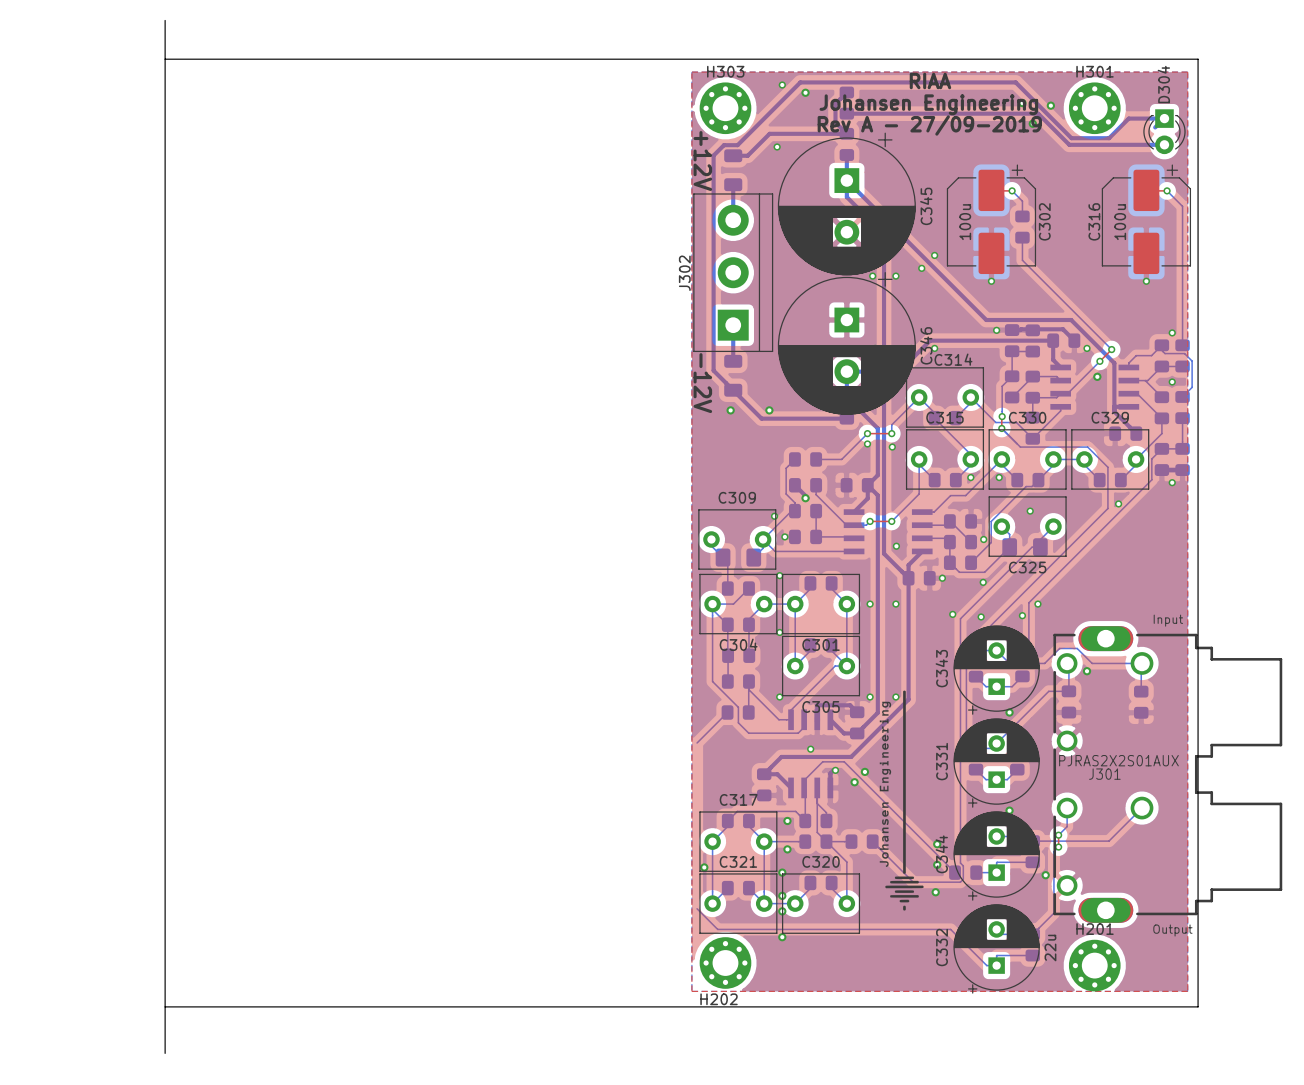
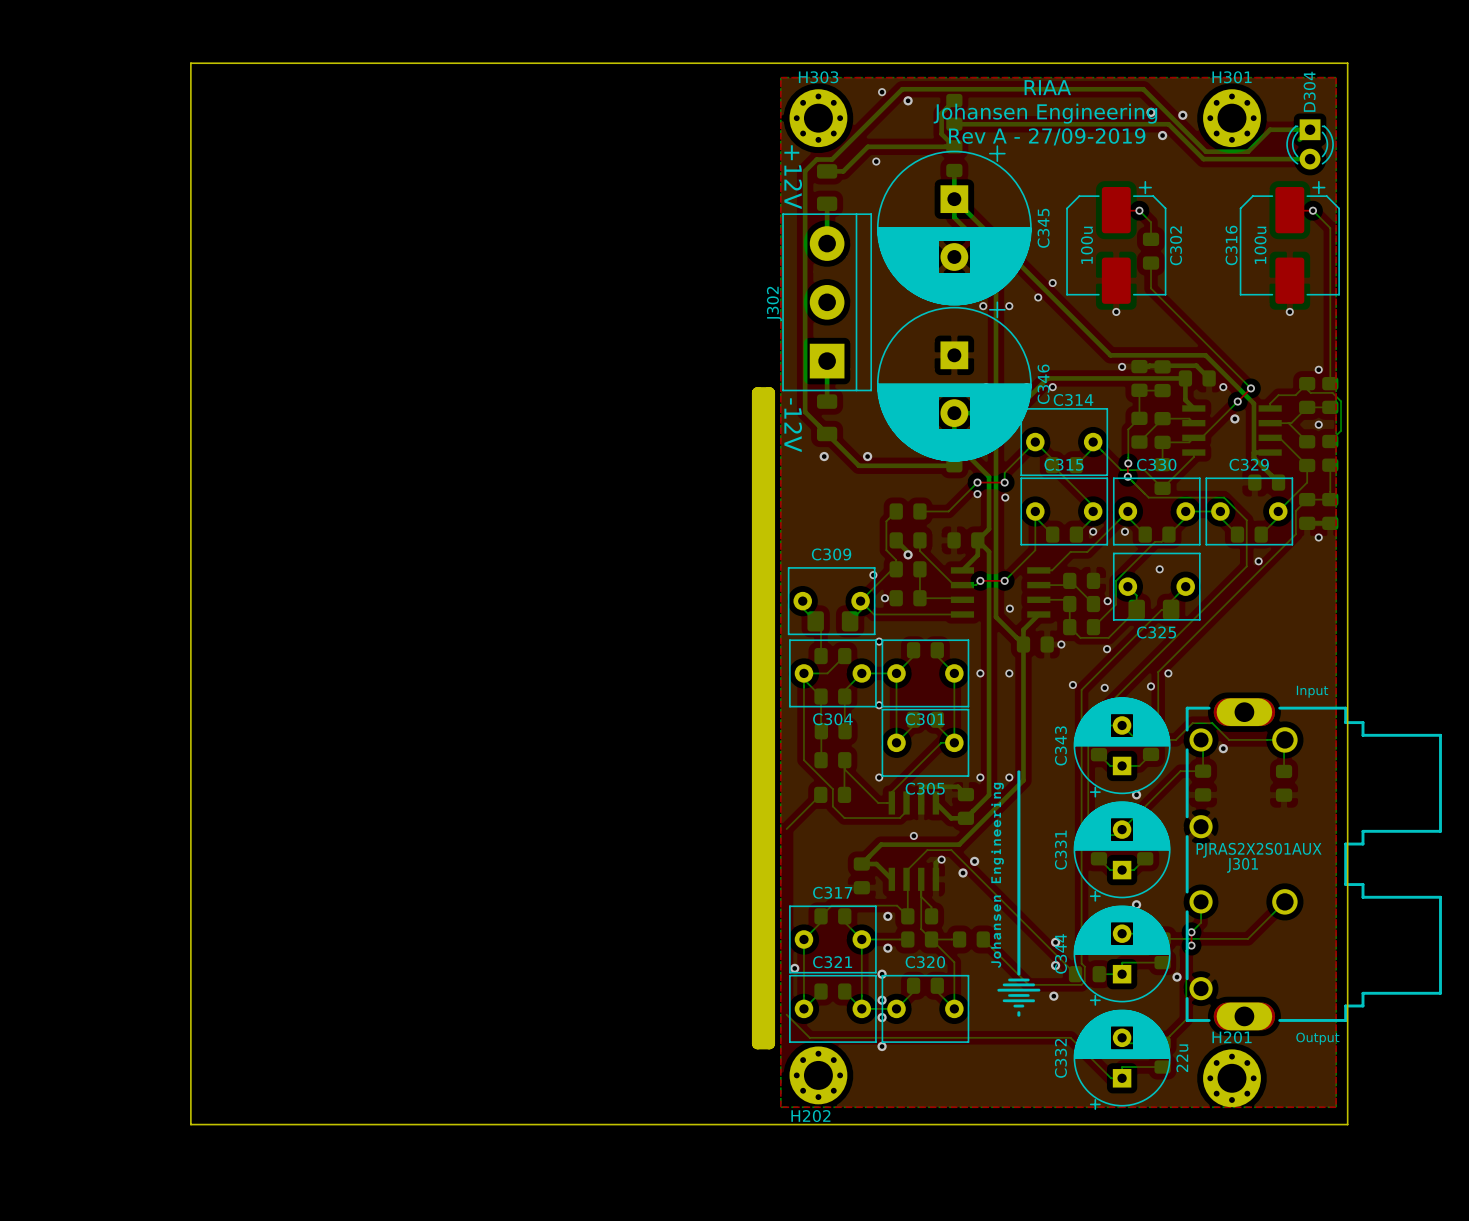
board edge: (165, 20) (165, 59) -> none
board edge: none -> (757, 392) (757, 1043) (769, 1043) (769, 392) (757, 392)
board edge: (165, 1006) (165, 1053) -> none

